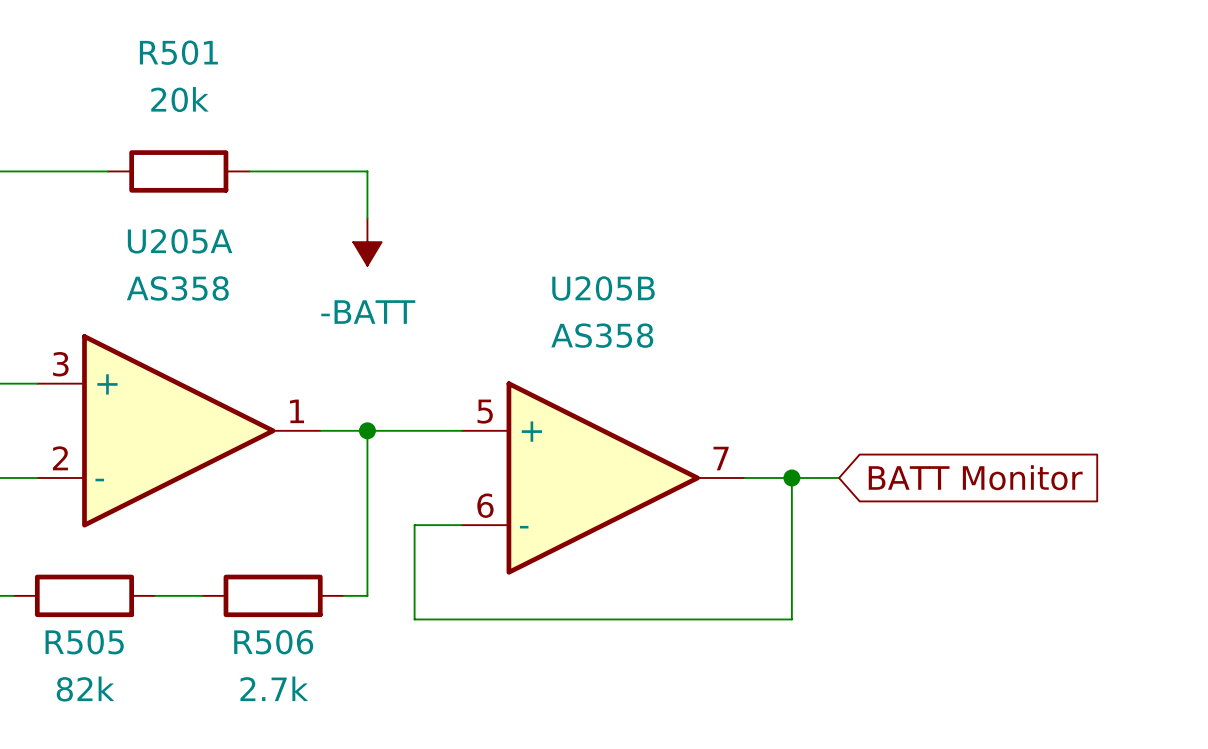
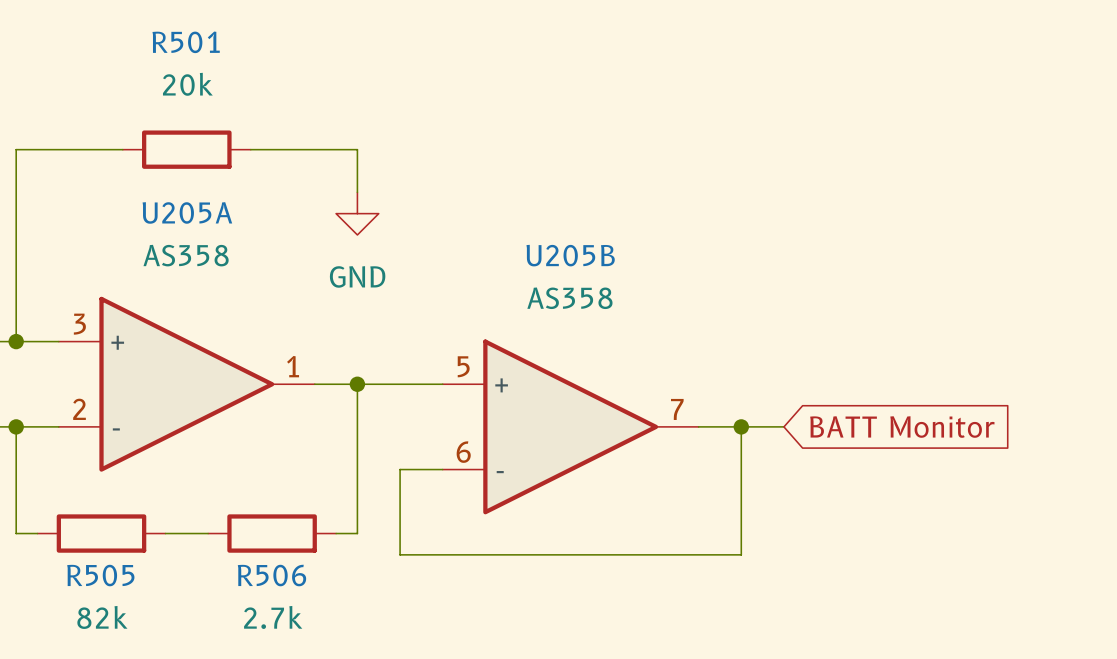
power symbol: -BATT (367, 242) -> GND (357, 213)

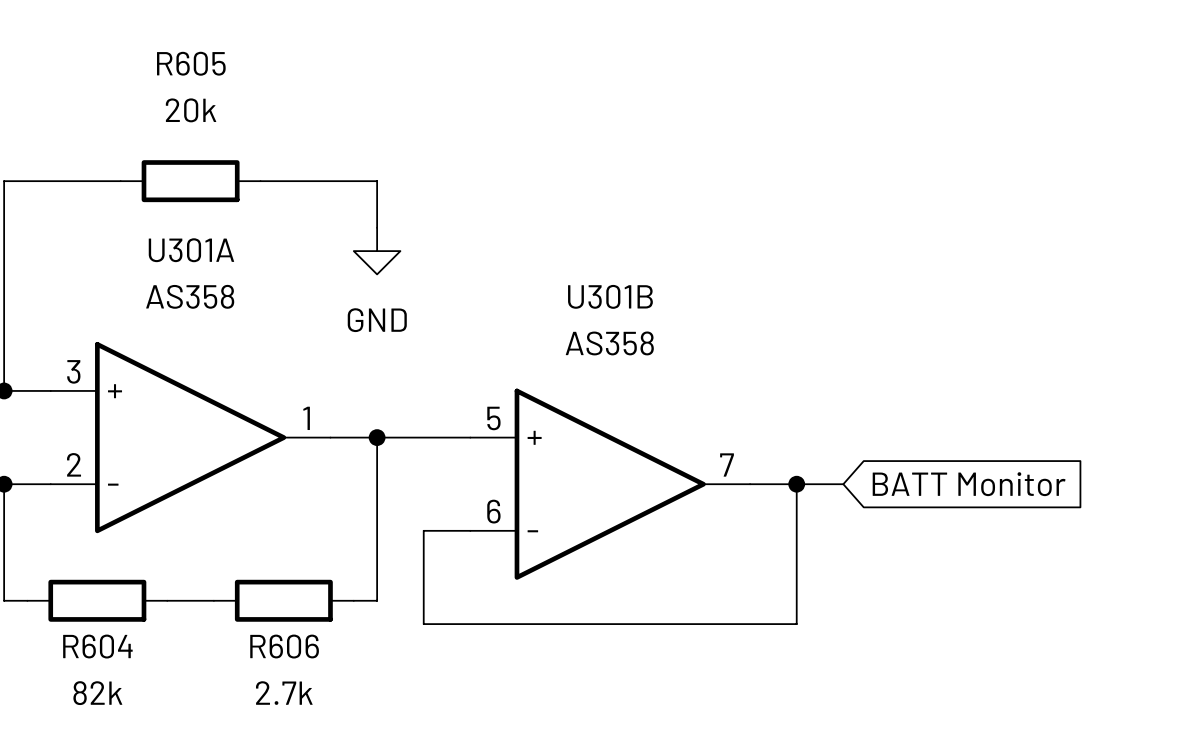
R501 name: R501 (186, 42) -> R605 (191, 63)
U205A name: U205A (187, 212) -> U301A (191, 250)
U205B name: U205B (570, 255) -> U301B (610, 296)
R505 name: R505 (100, 575) -> R604 (97, 646)
R506 name: R506 (271, 575) -> R606 (284, 646)

